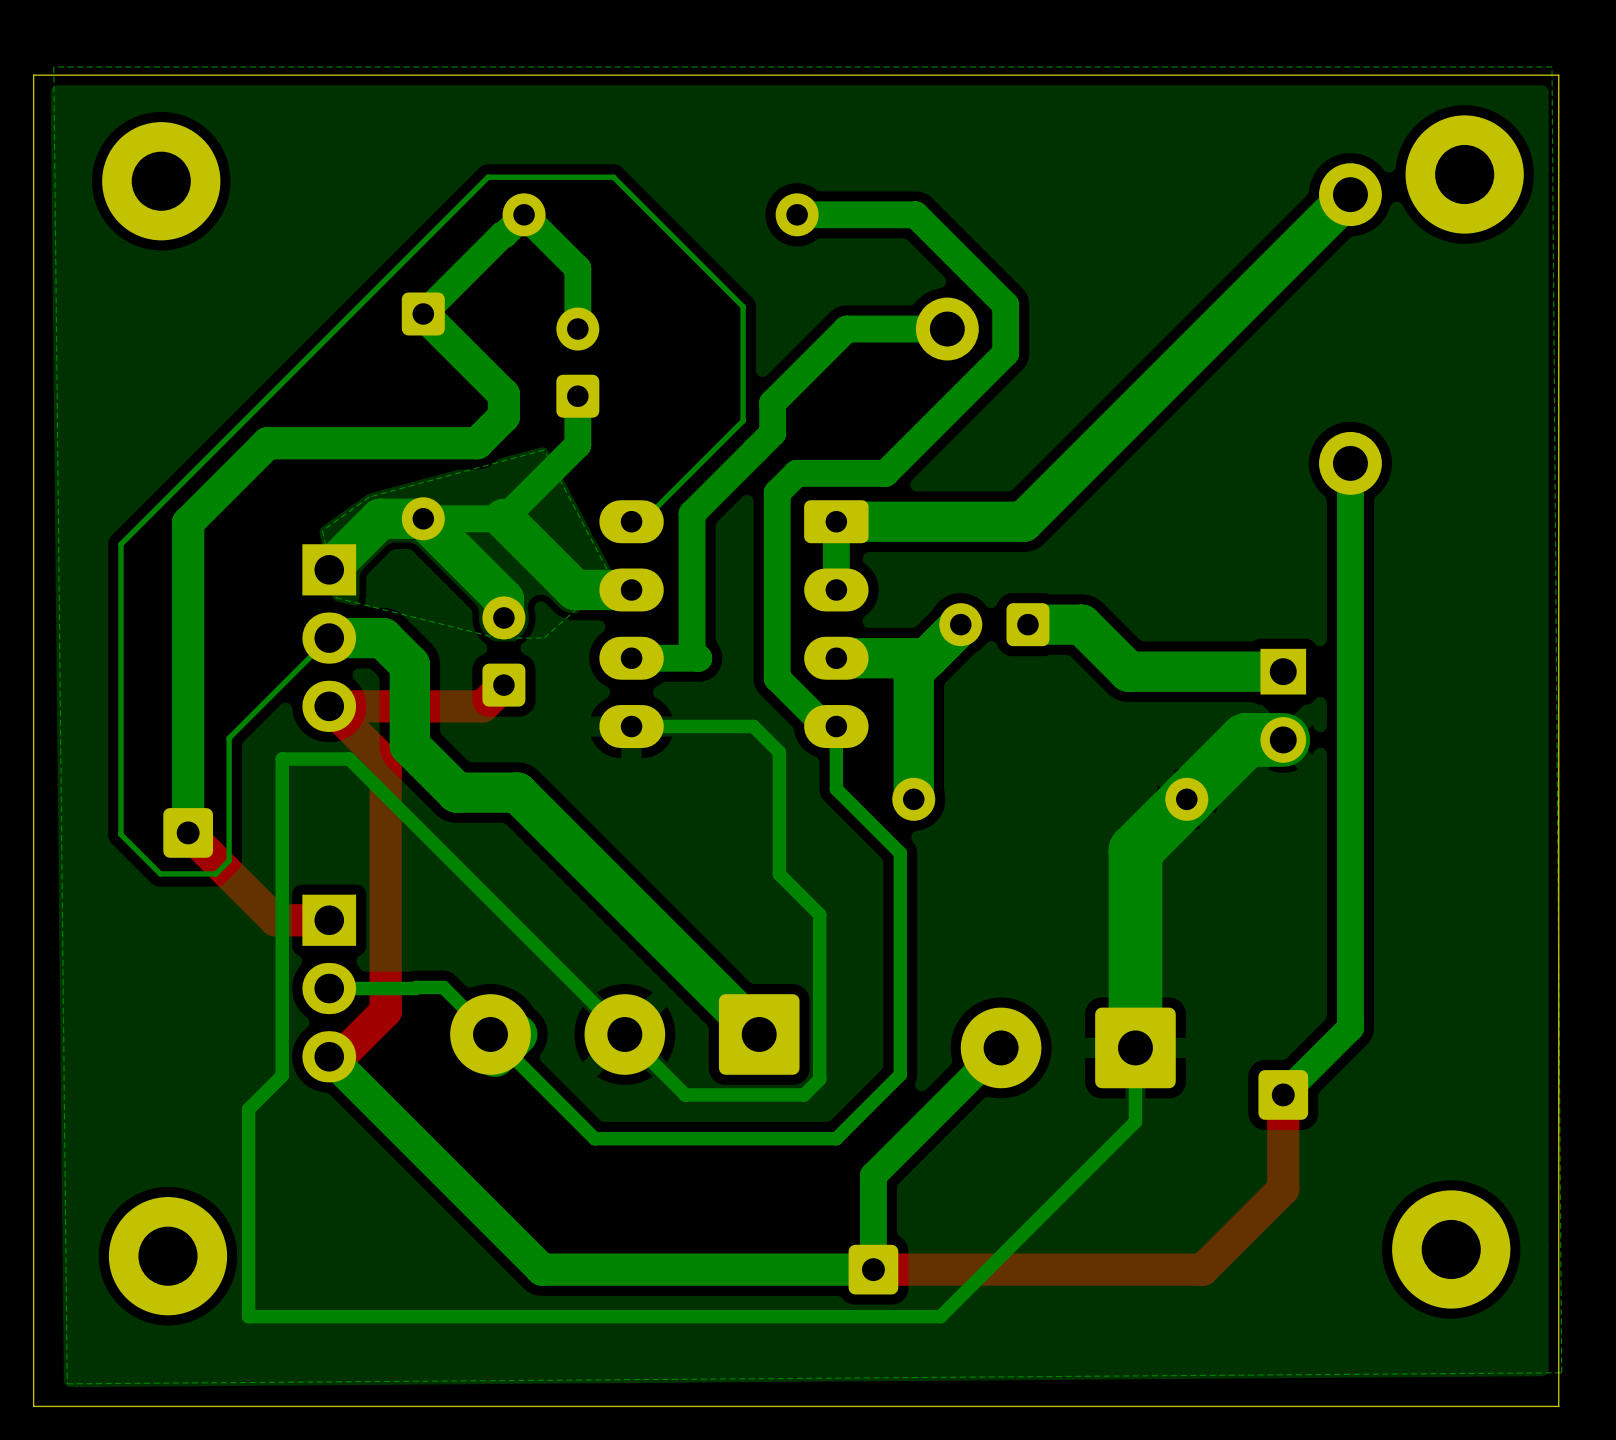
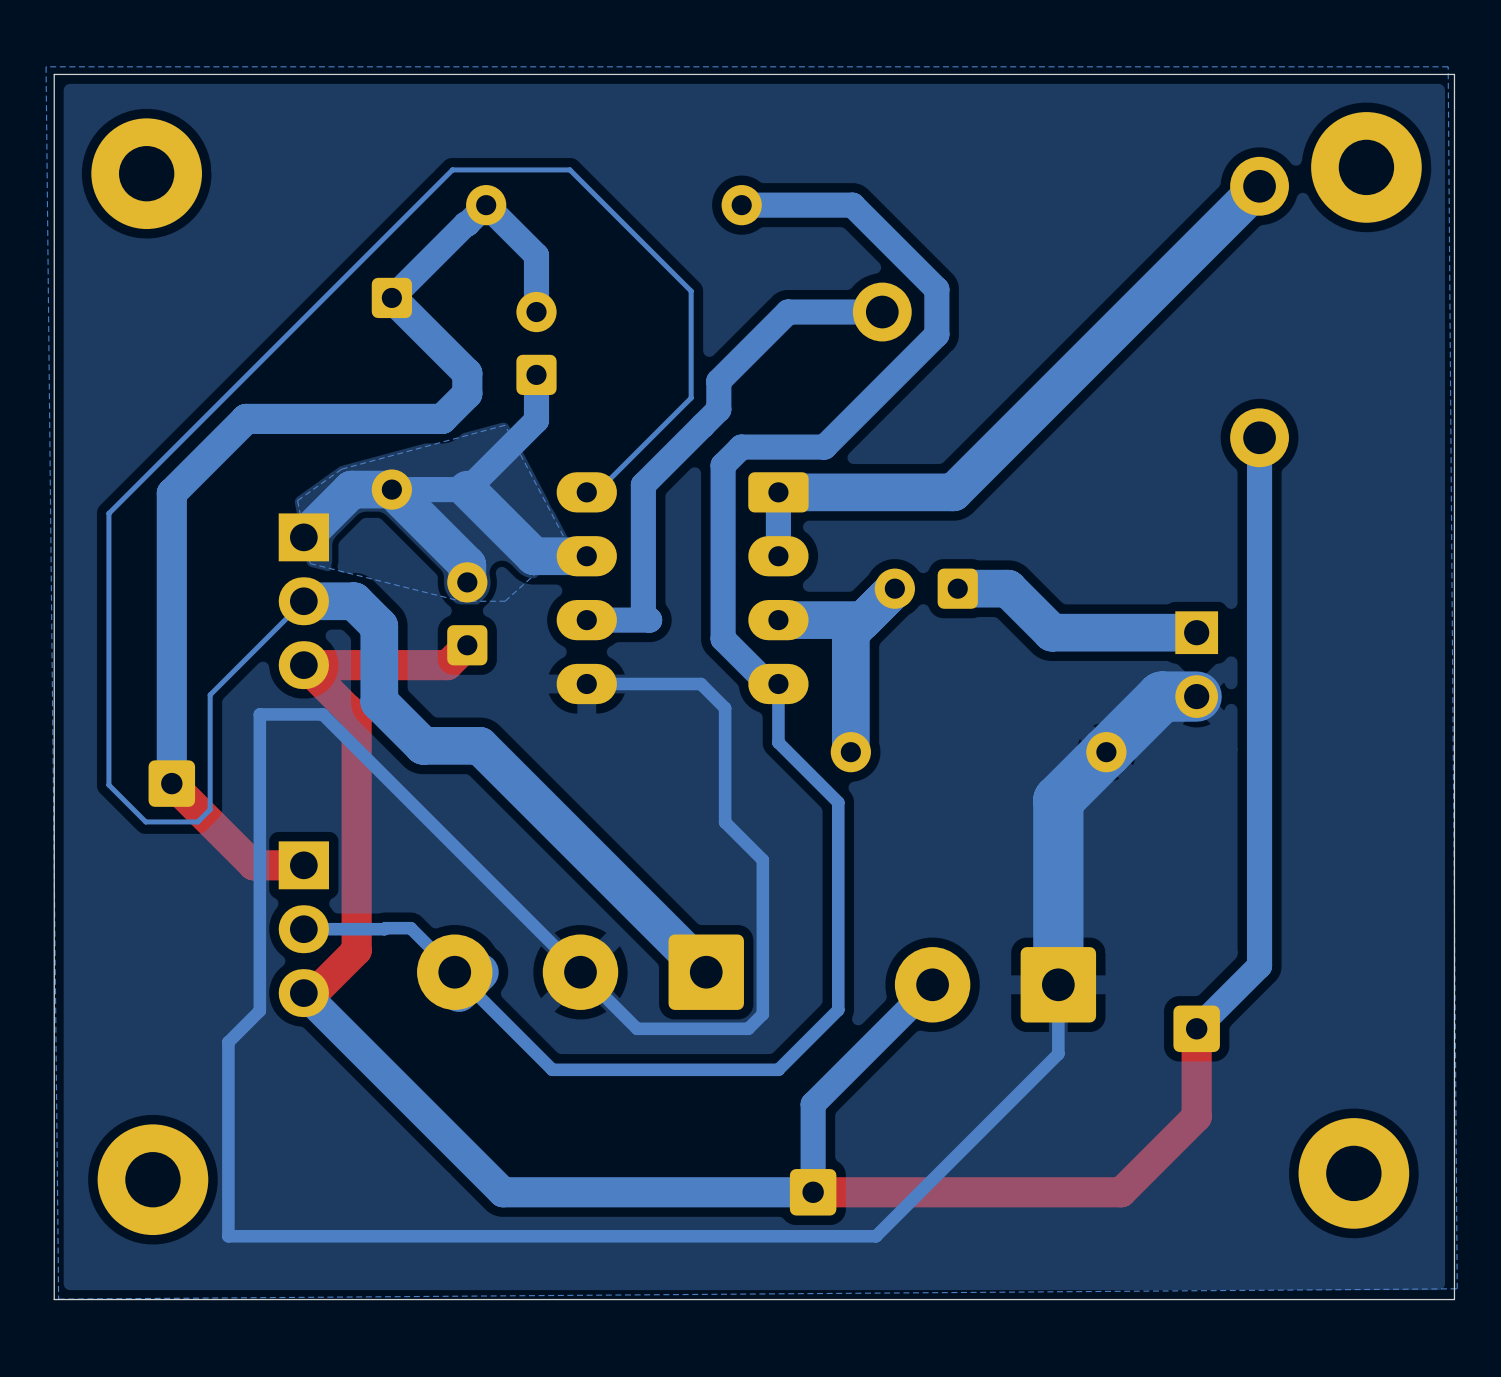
board edge: (62, 75) (33, 75) (33, 1406) (1558, 1406) (1558, 1384) -> (54, 74) (54, 1299) (1454, 1299)

